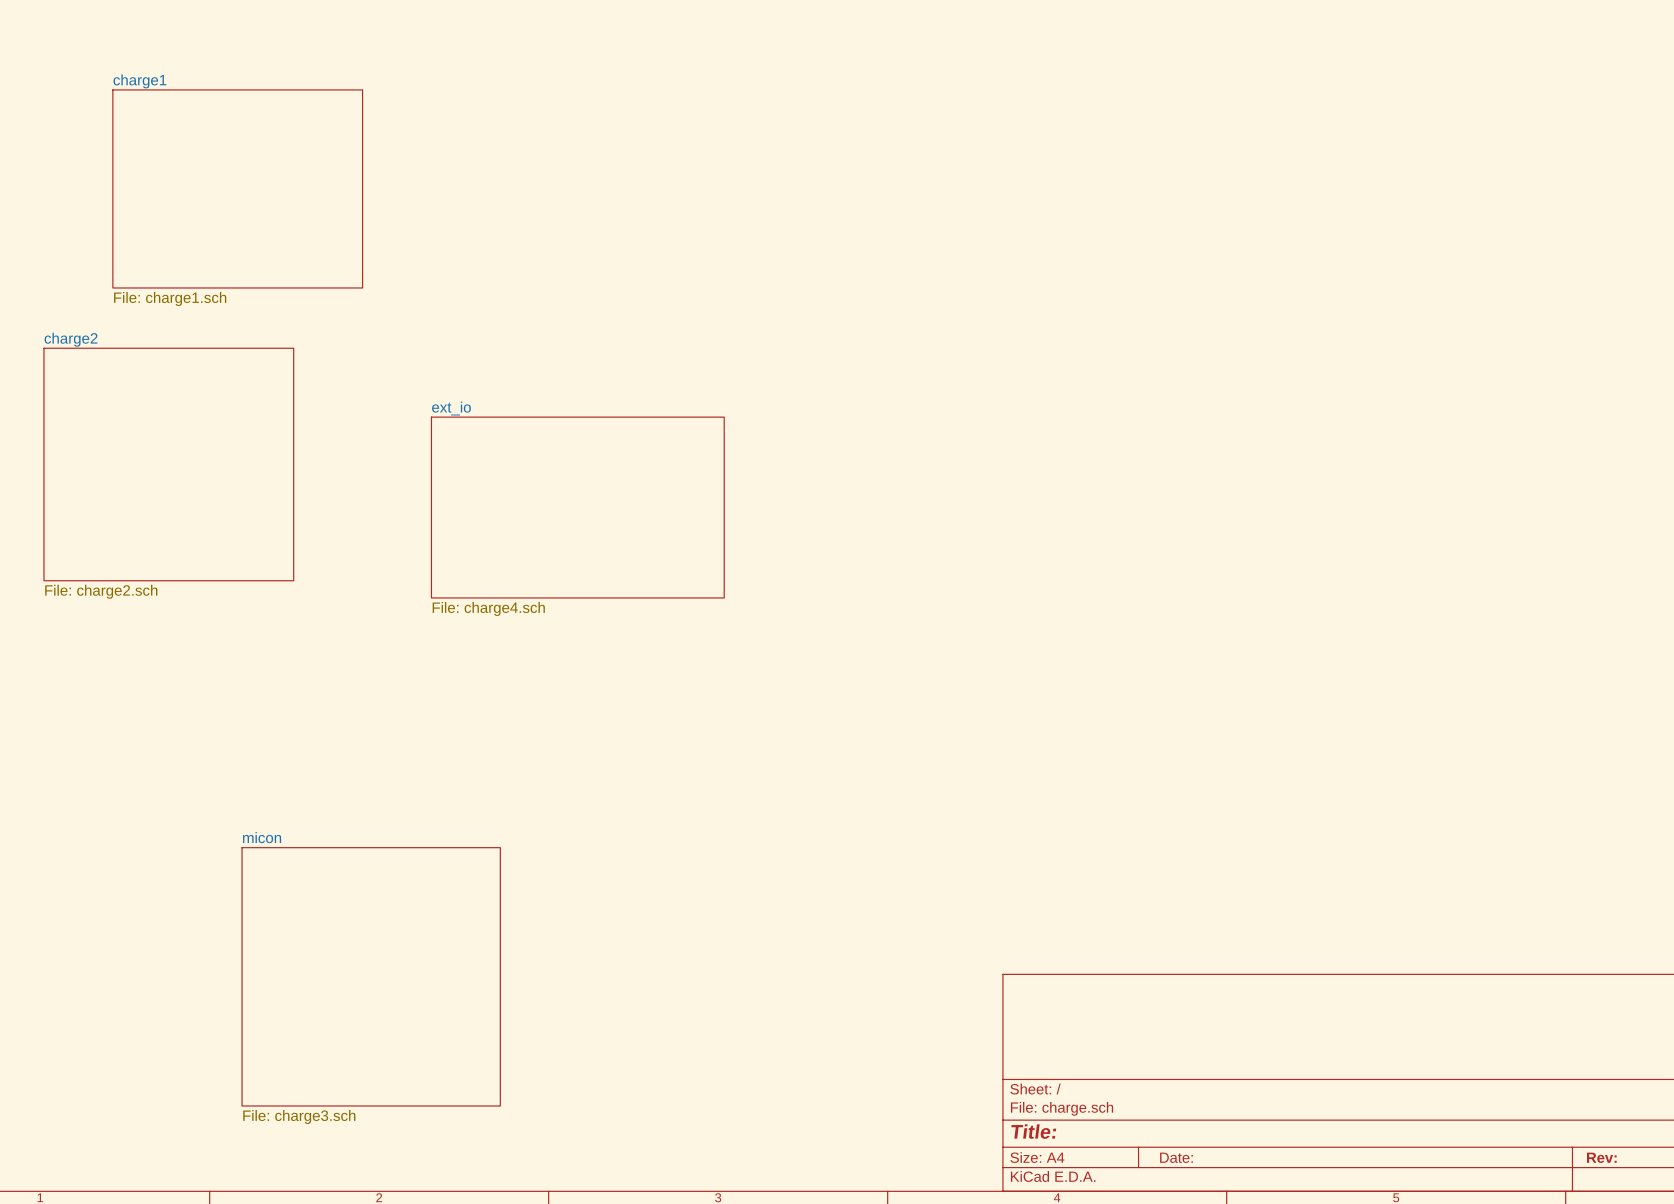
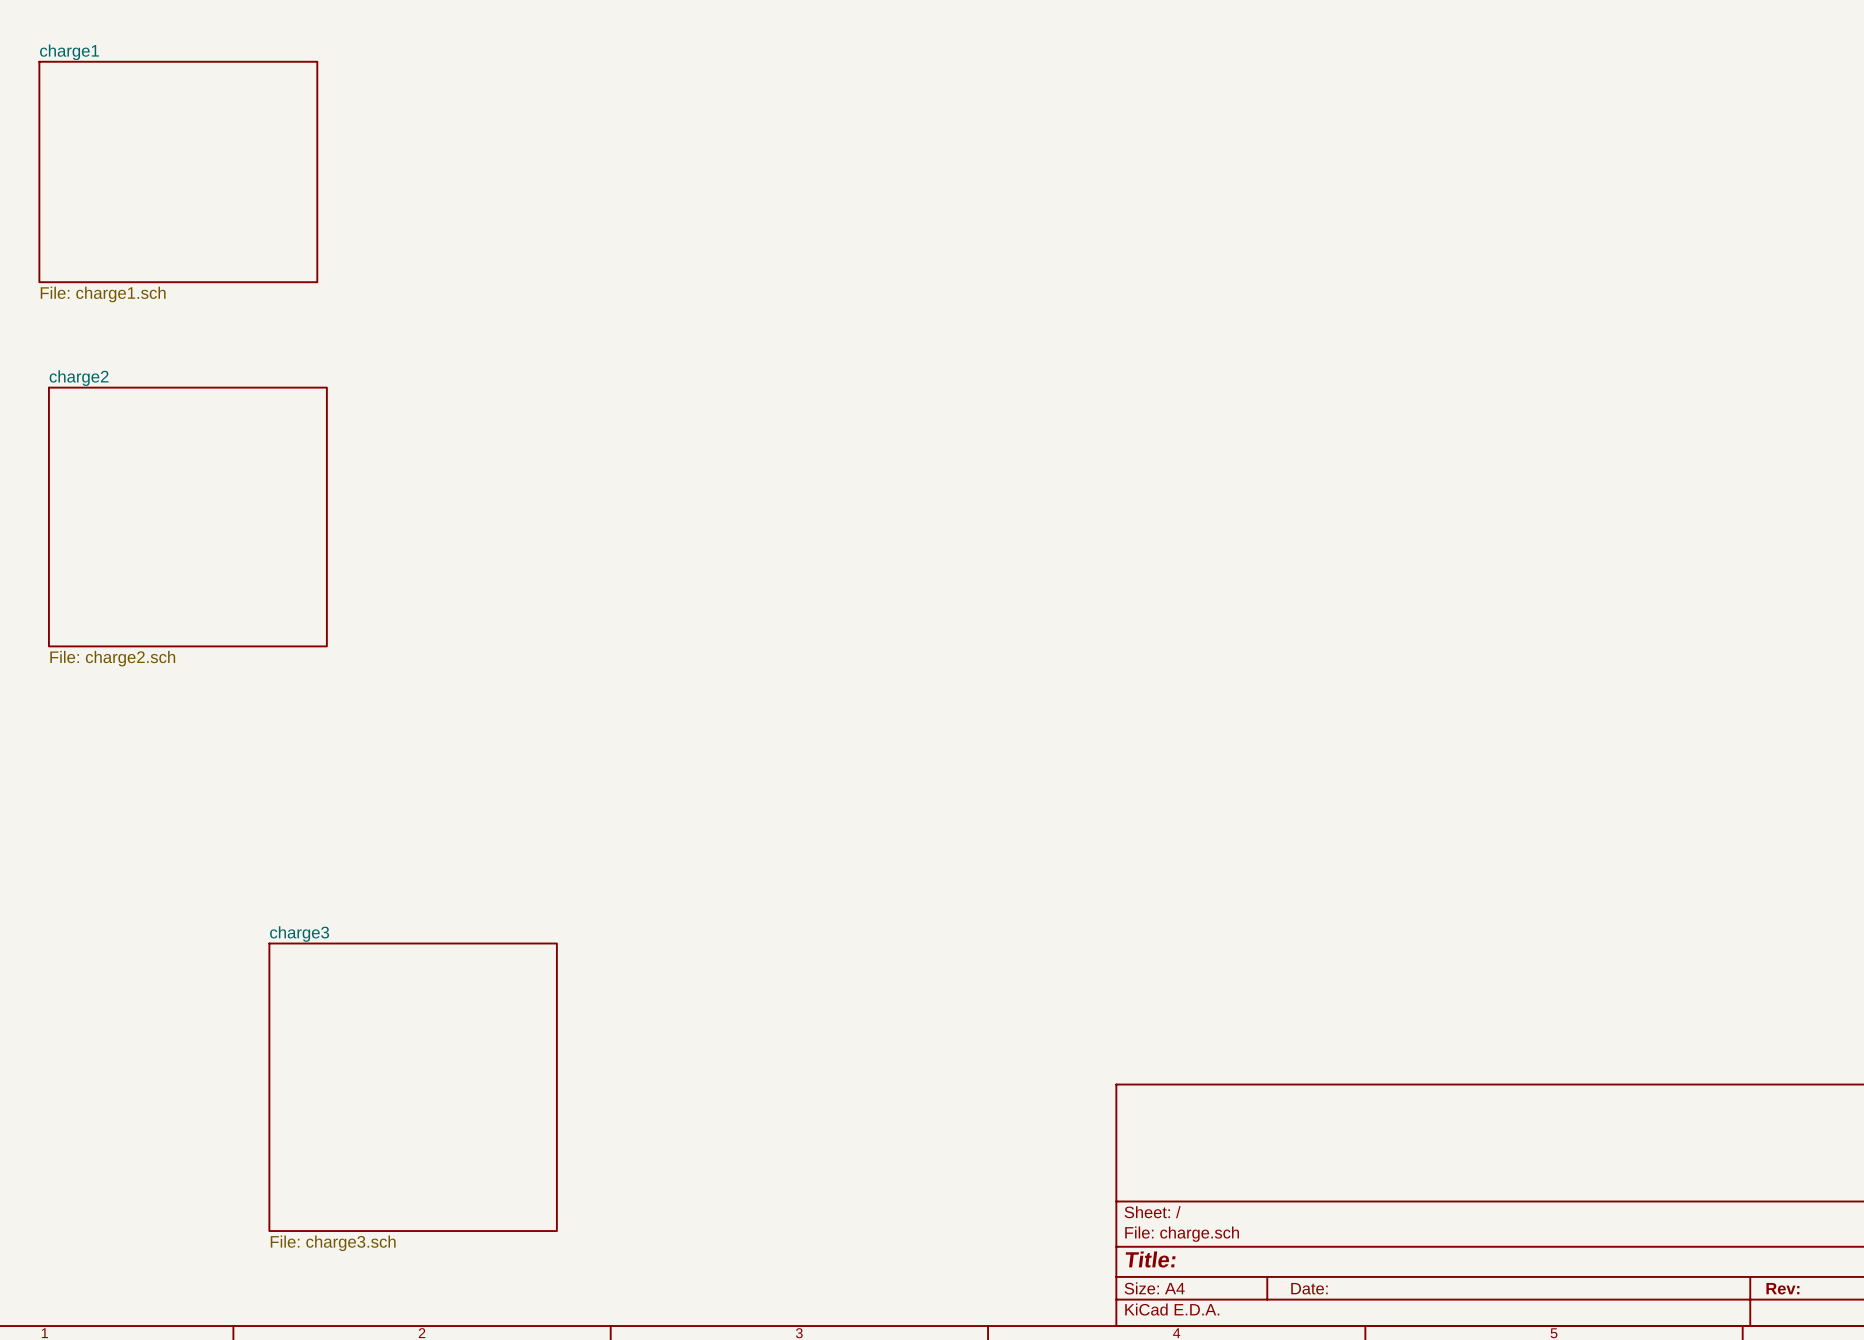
sheet charge1 position: (237, 188) -> (178, 171)
sheet ext_io: File: charge4.sch (577, 507) -> none
sheet micon name: micon (262, 837) -> charge3 (299, 934)

